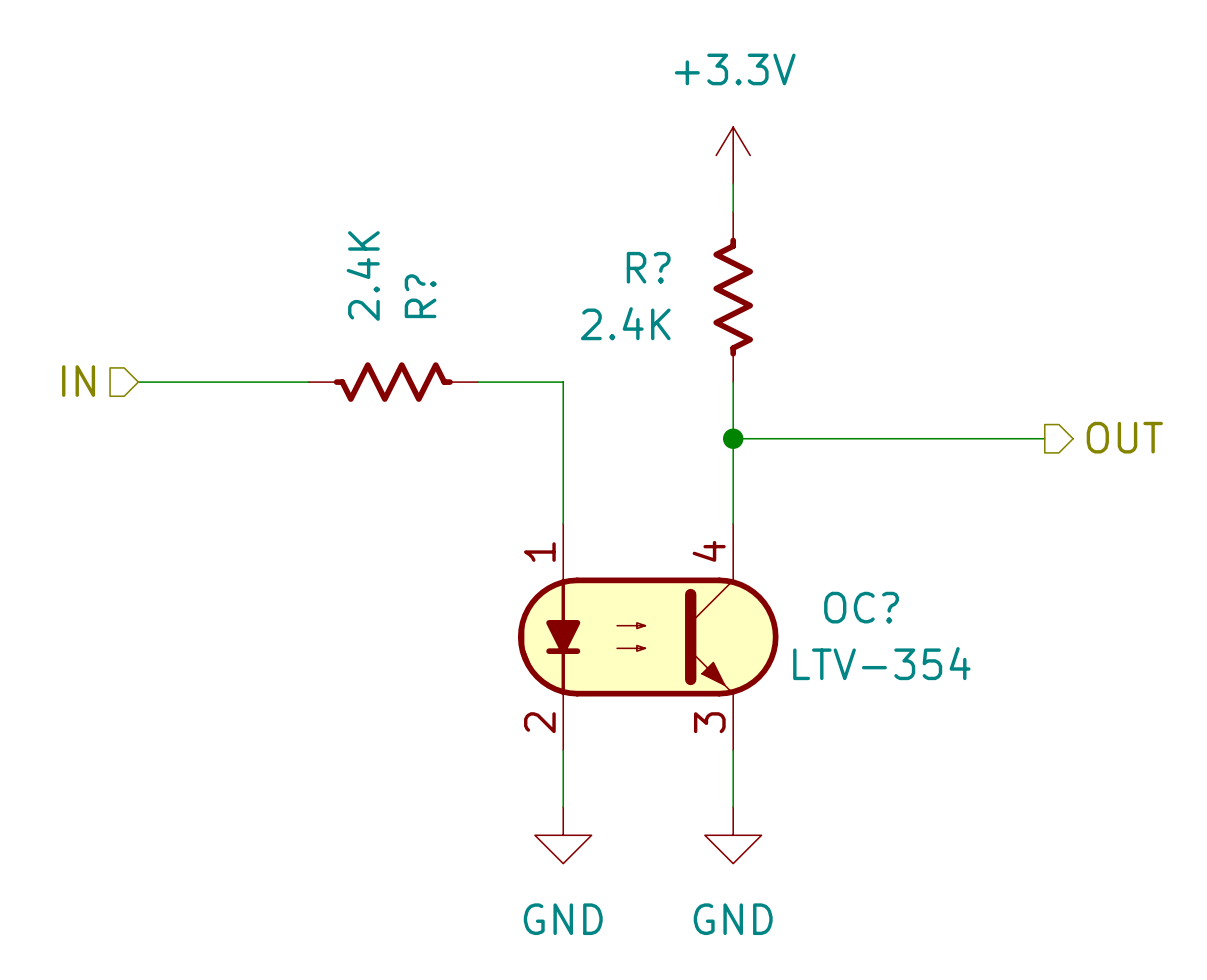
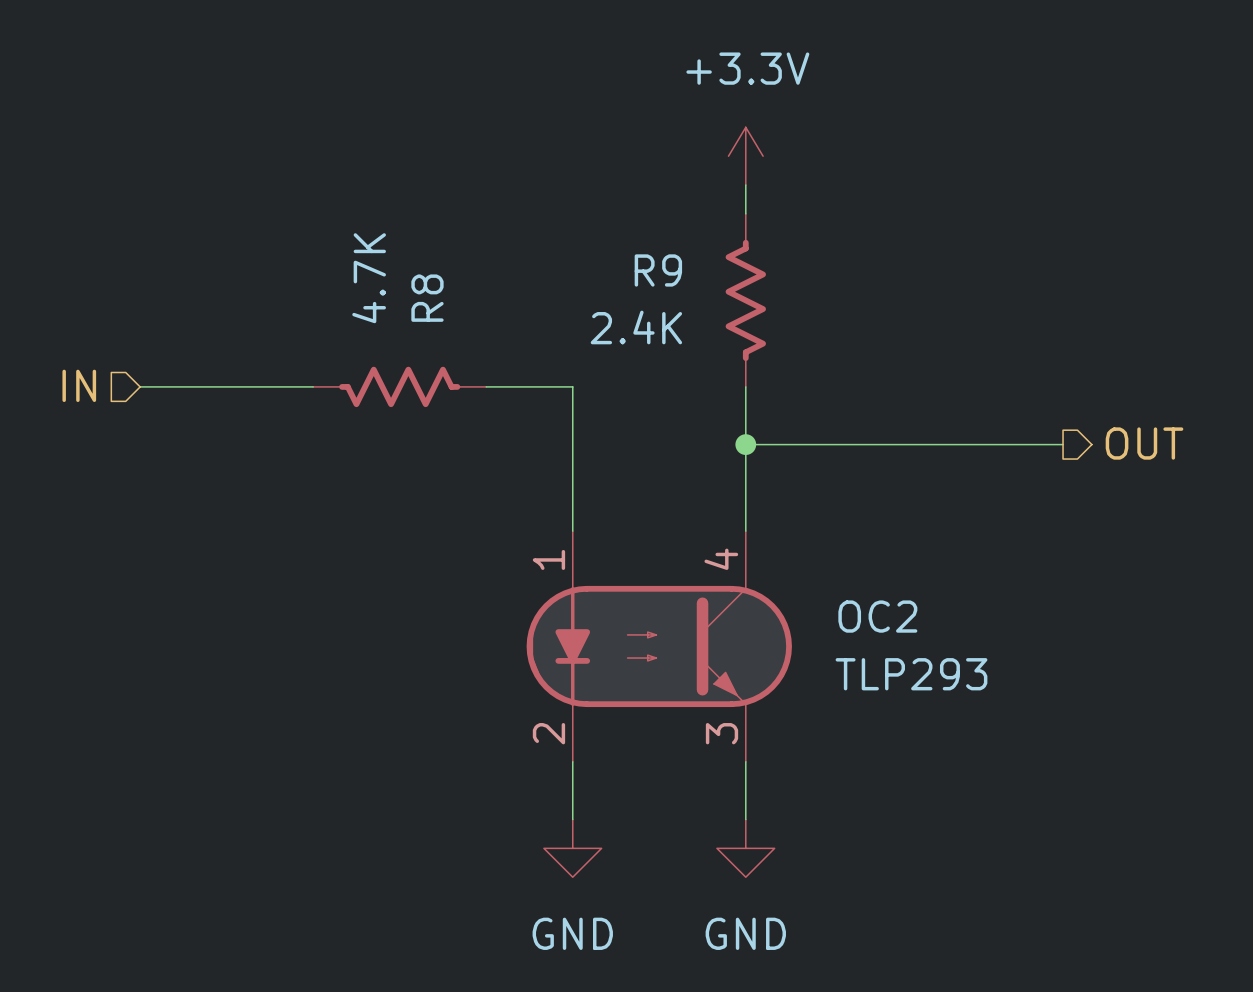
R? name: R? (648, 267) -> R9 (658, 270)
R? value: 2.4K (363, 275) -> 4.7K (369, 278)
R? name: R? (420, 296) -> R8 (427, 298)
OC? name: OC? (861, 607) -> OC2 (877, 616)
OC? text: LTV-354 (881, 663) -> none
OC? value: none -> TLP293 (911, 674)

